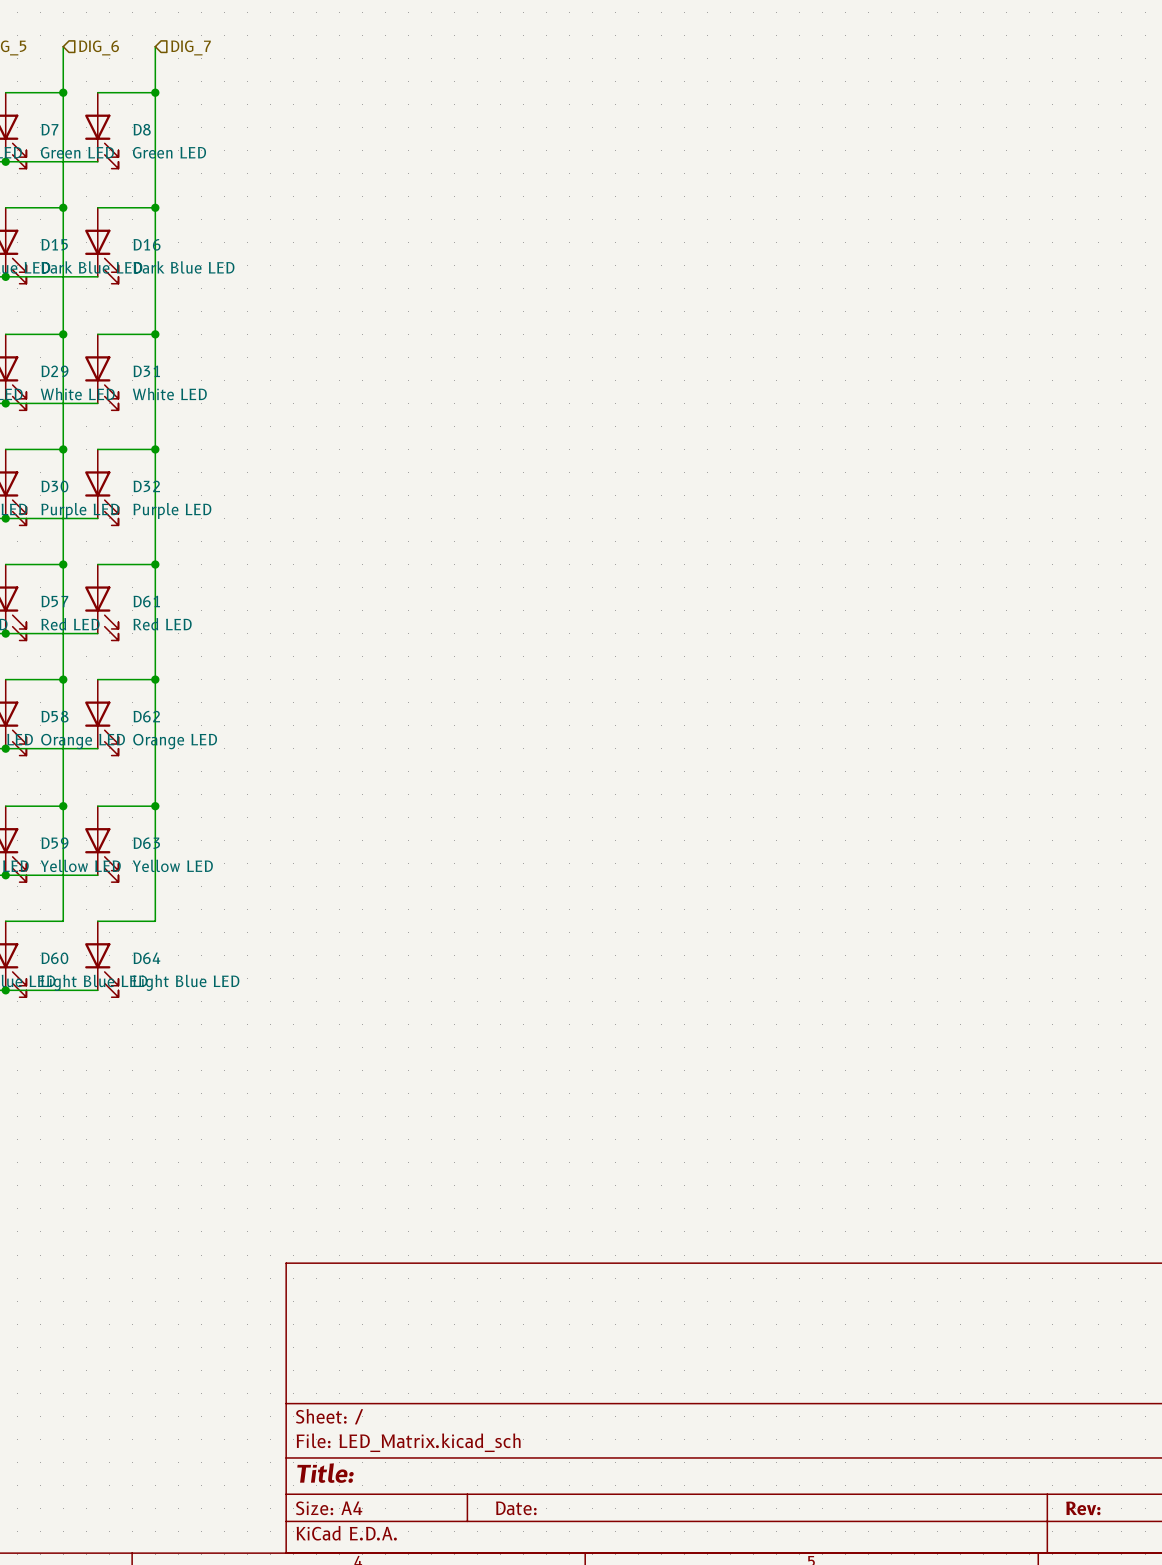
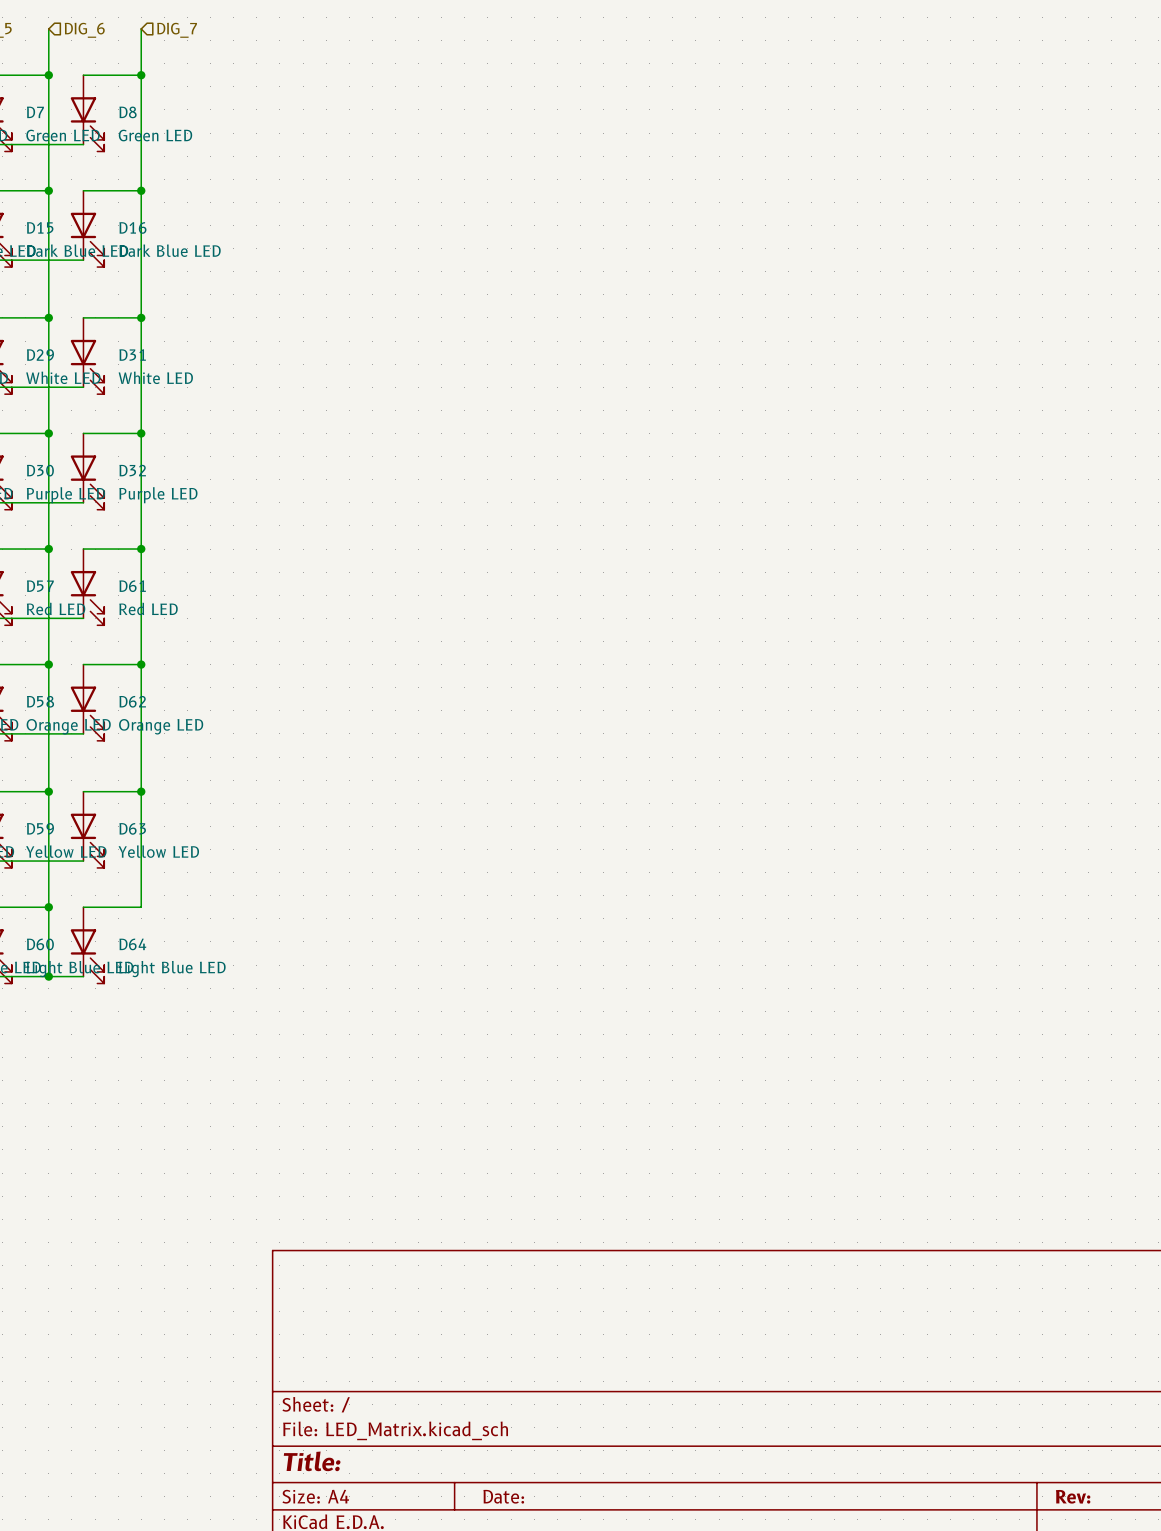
wire: none -> (48, 907) (48, 976)
junction: none -> (48, 907)
junction: none -> (48, 976)

